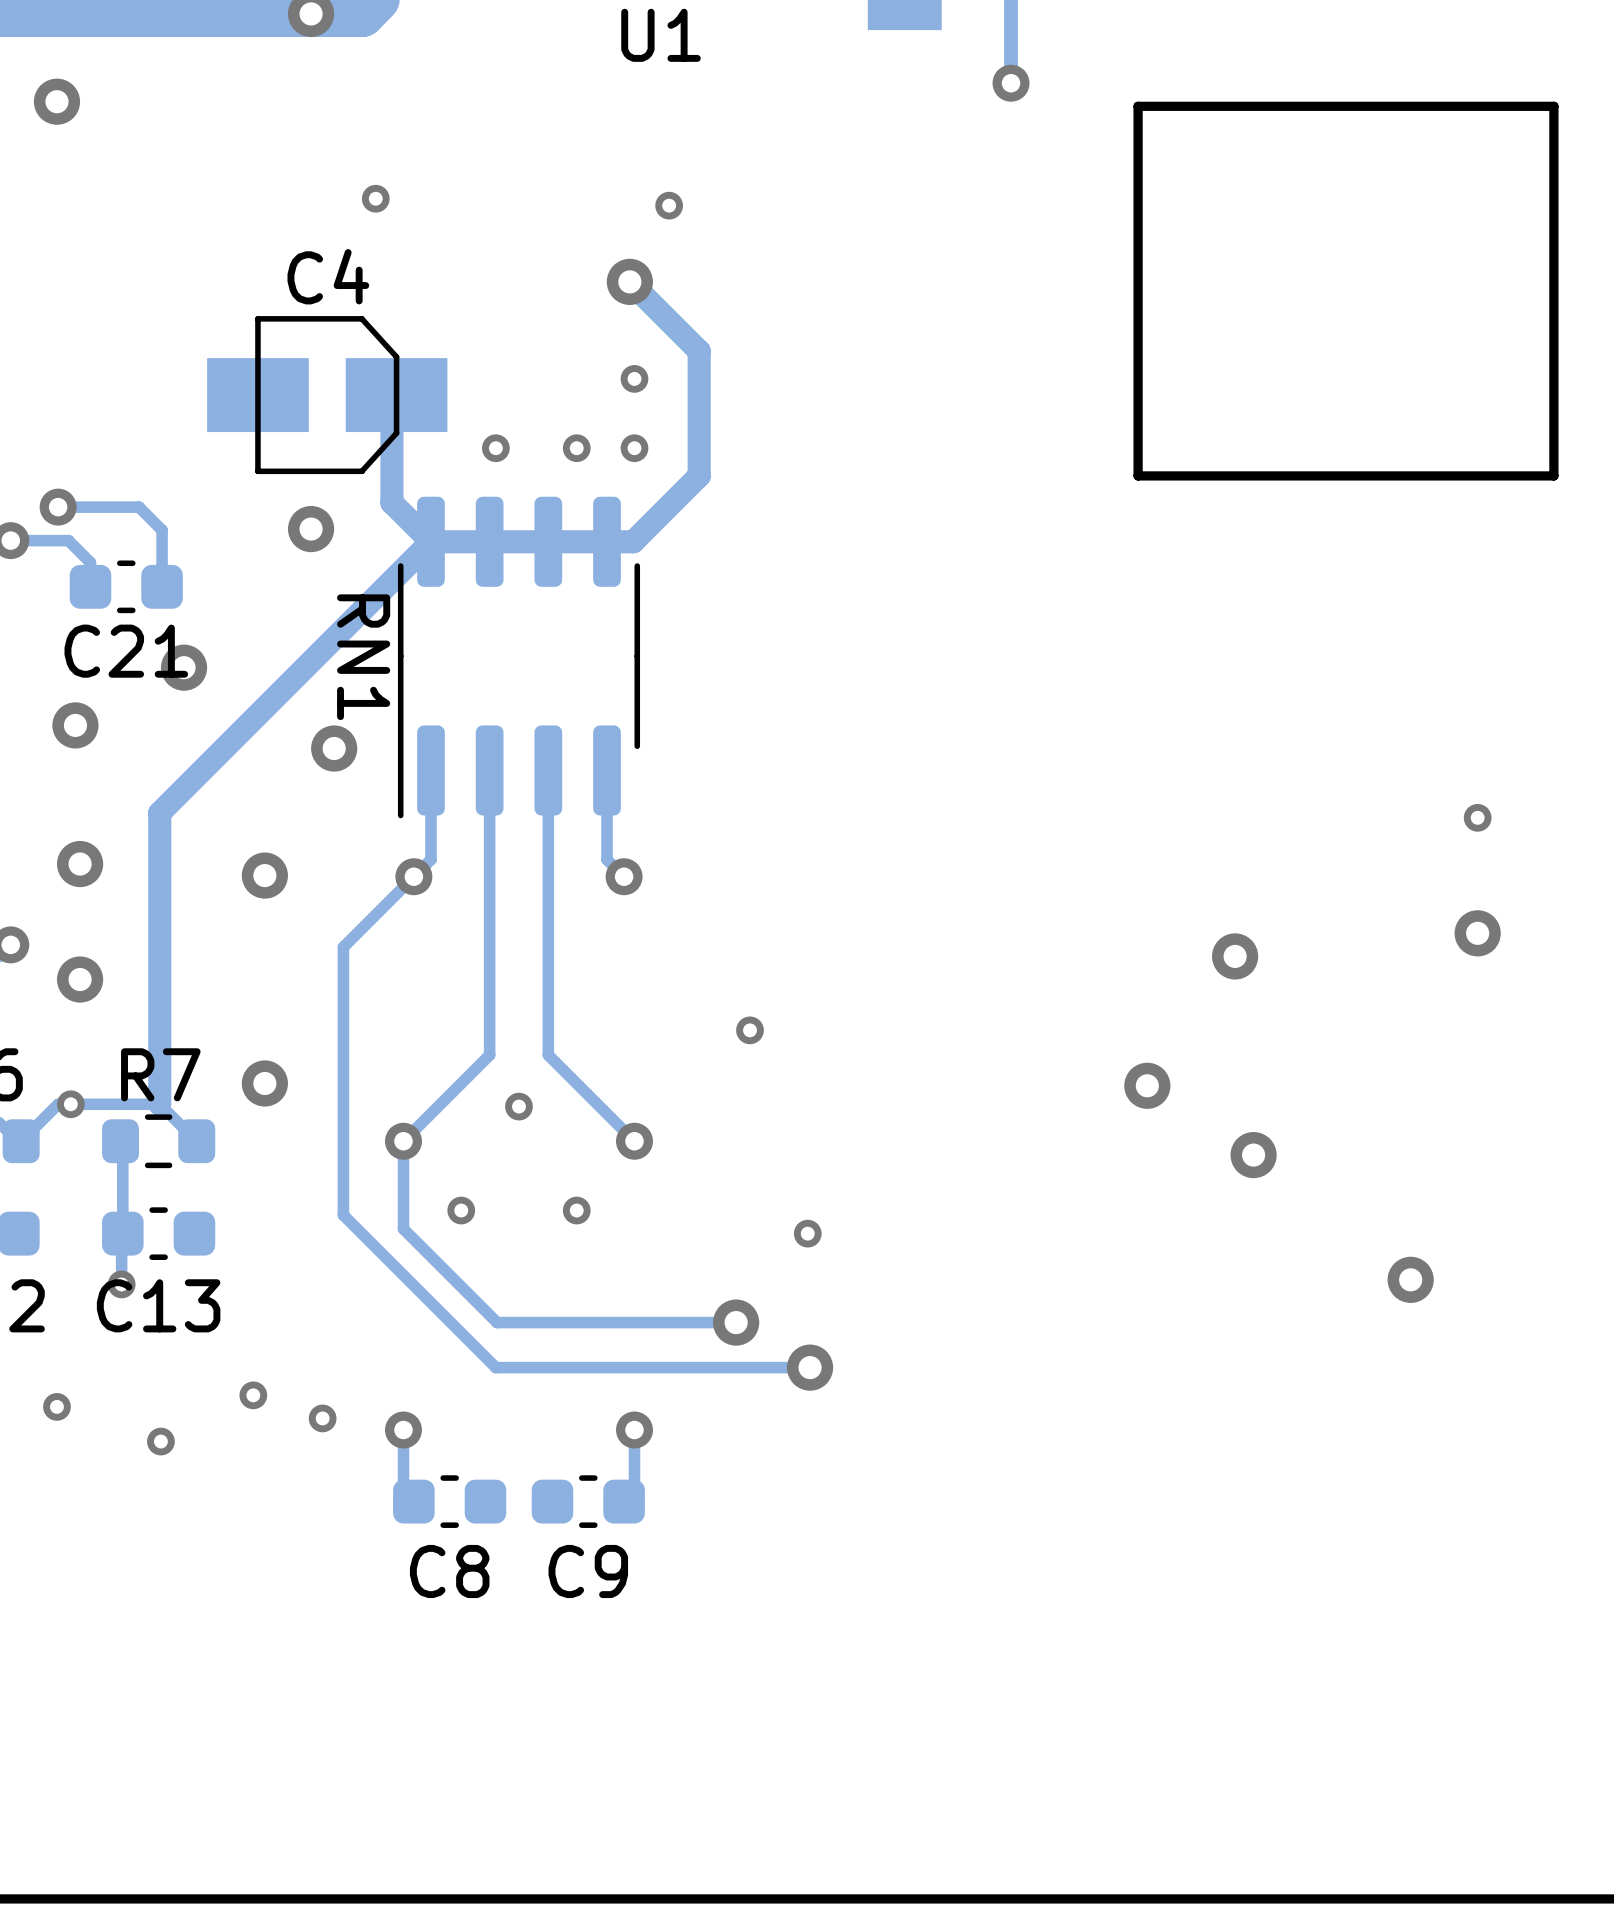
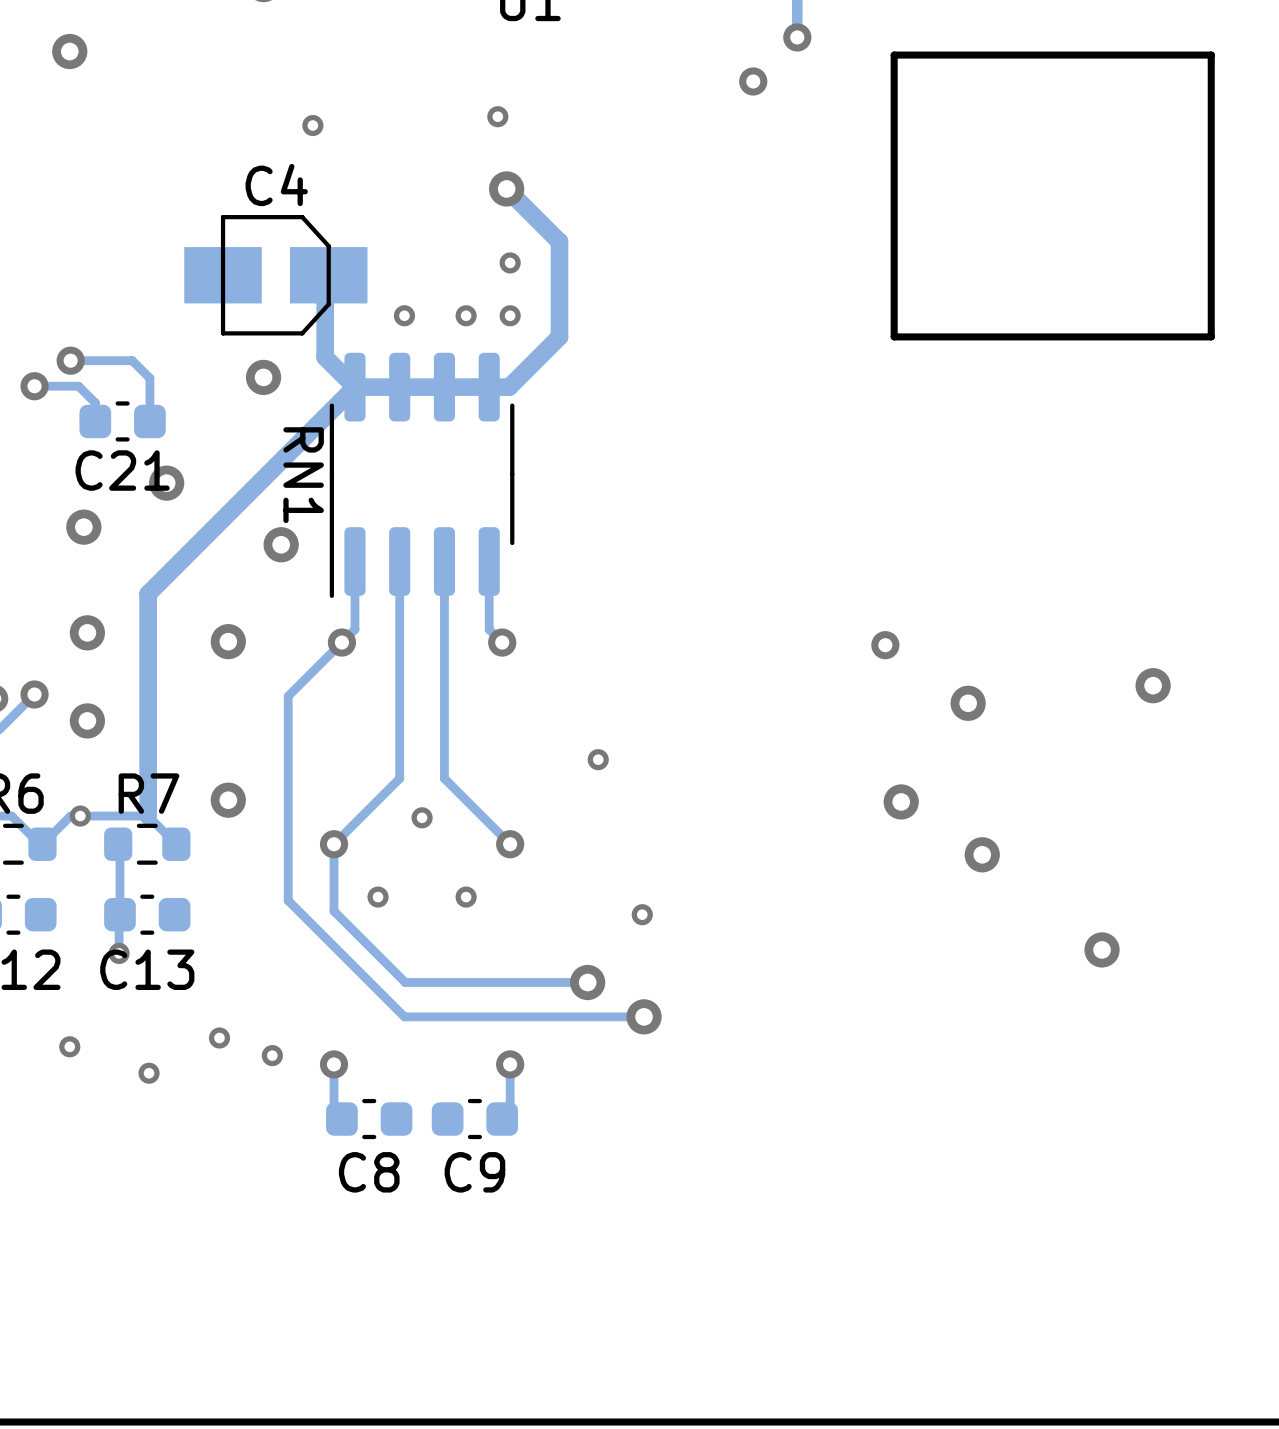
via: none -> (753, 81)
via position: (669, 205) -> (497, 116)
via: (1477, 817) -> none
via: none -> (885, 645)

